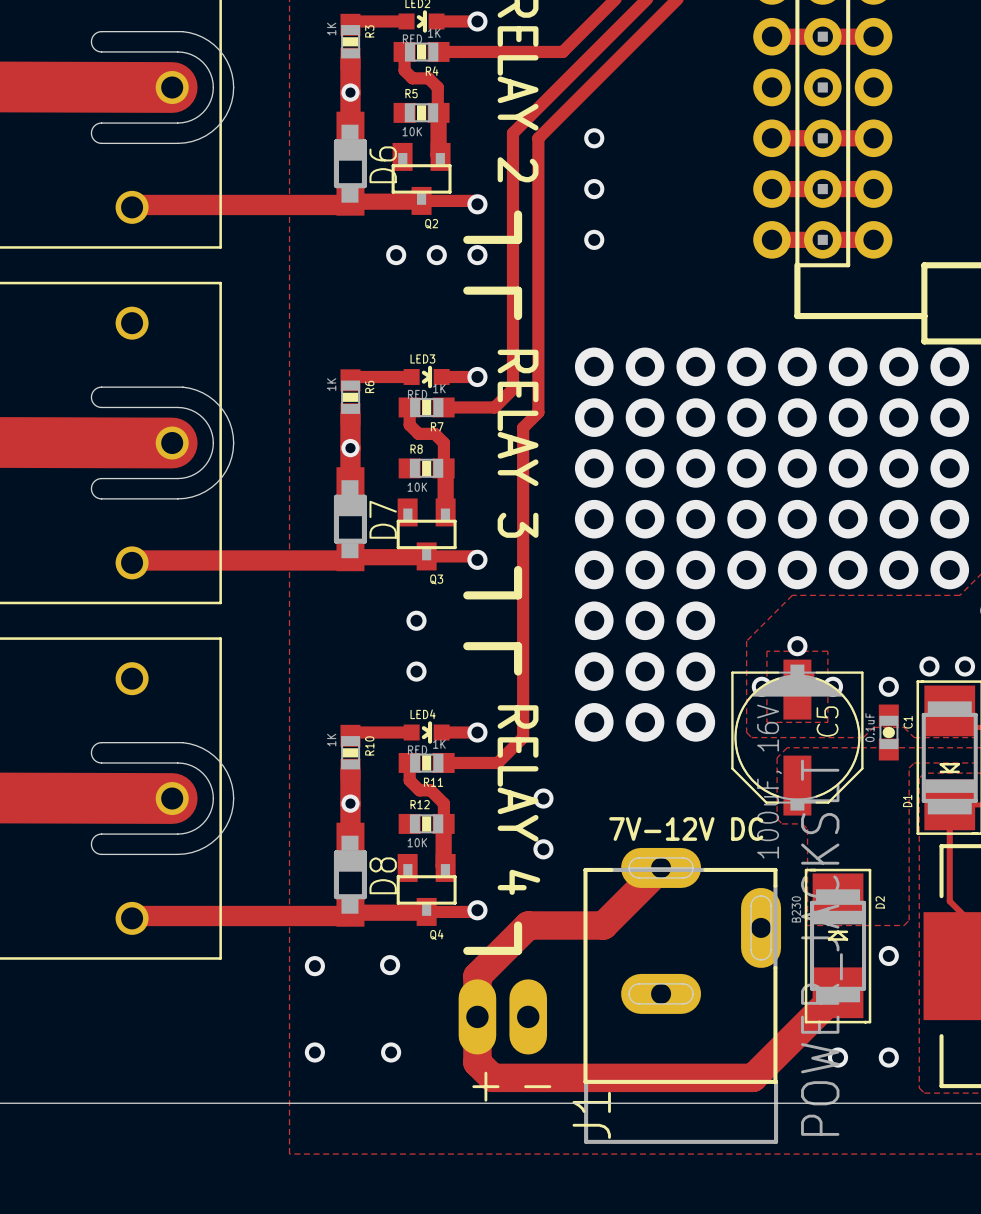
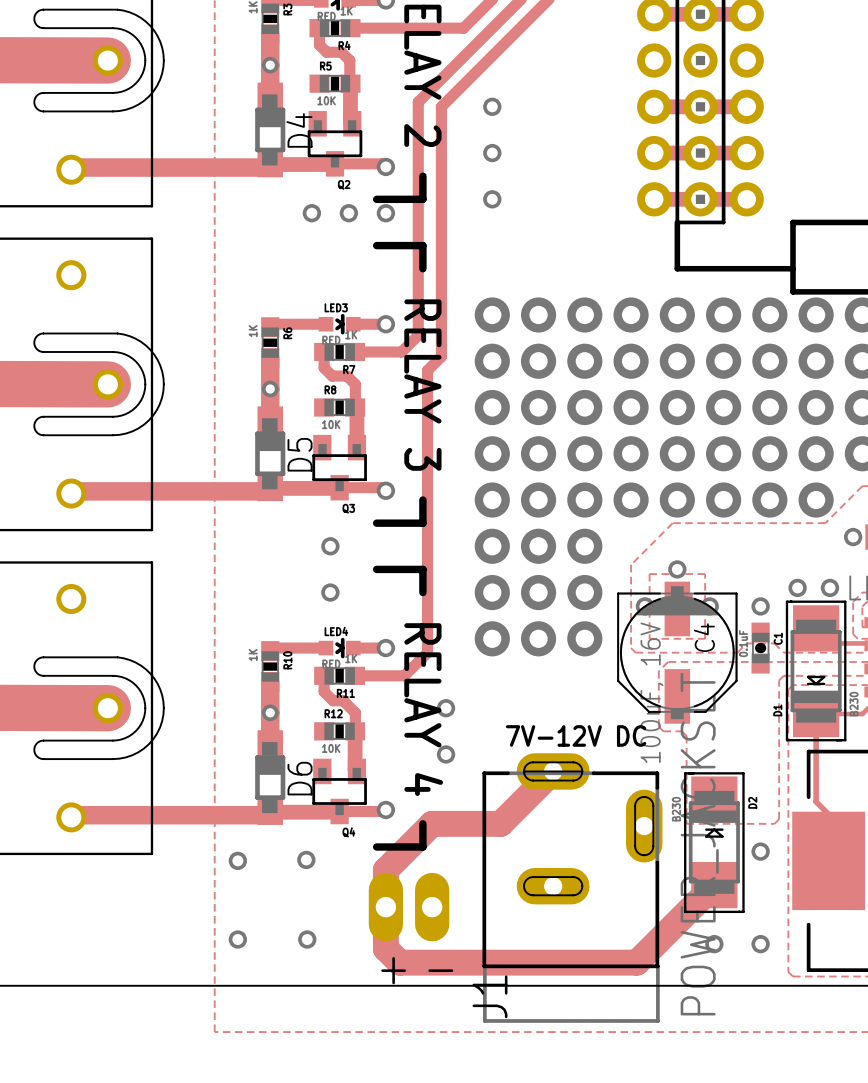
D6 name: D6 (383, 164) -> D4 (299, 130)
D7 name: D7 (383, 519) -> D5 (300, 454)
C5 name: C5 (827, 721) -> C4 (704, 637)
D8 name: D8 (383, 875) -> D6 (300, 778)

